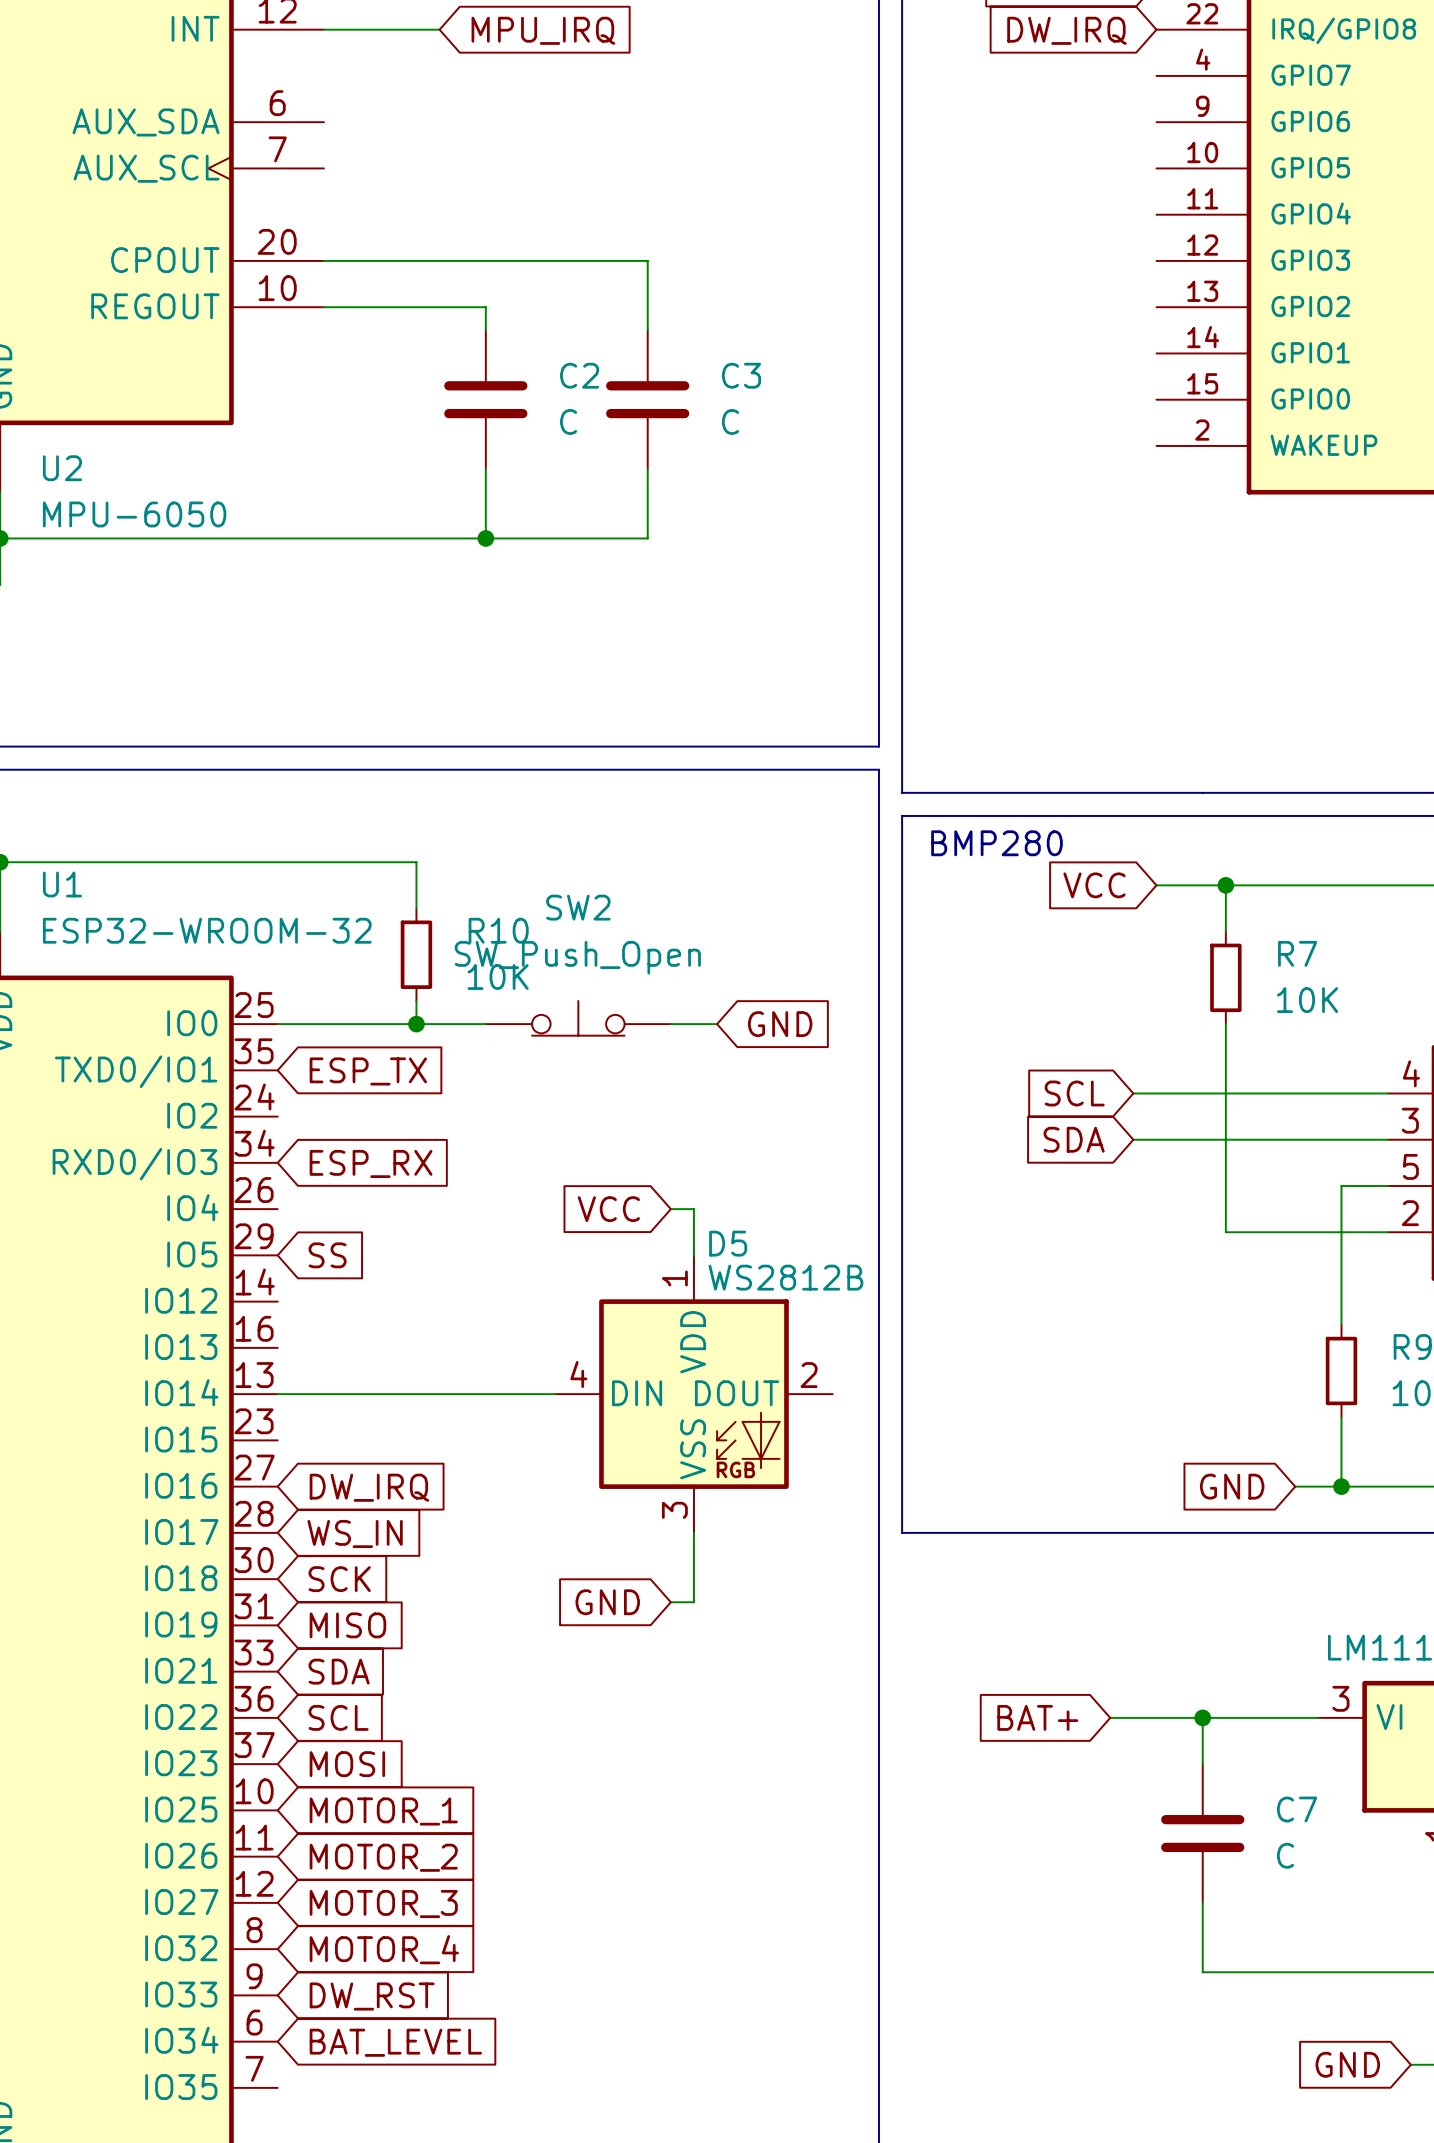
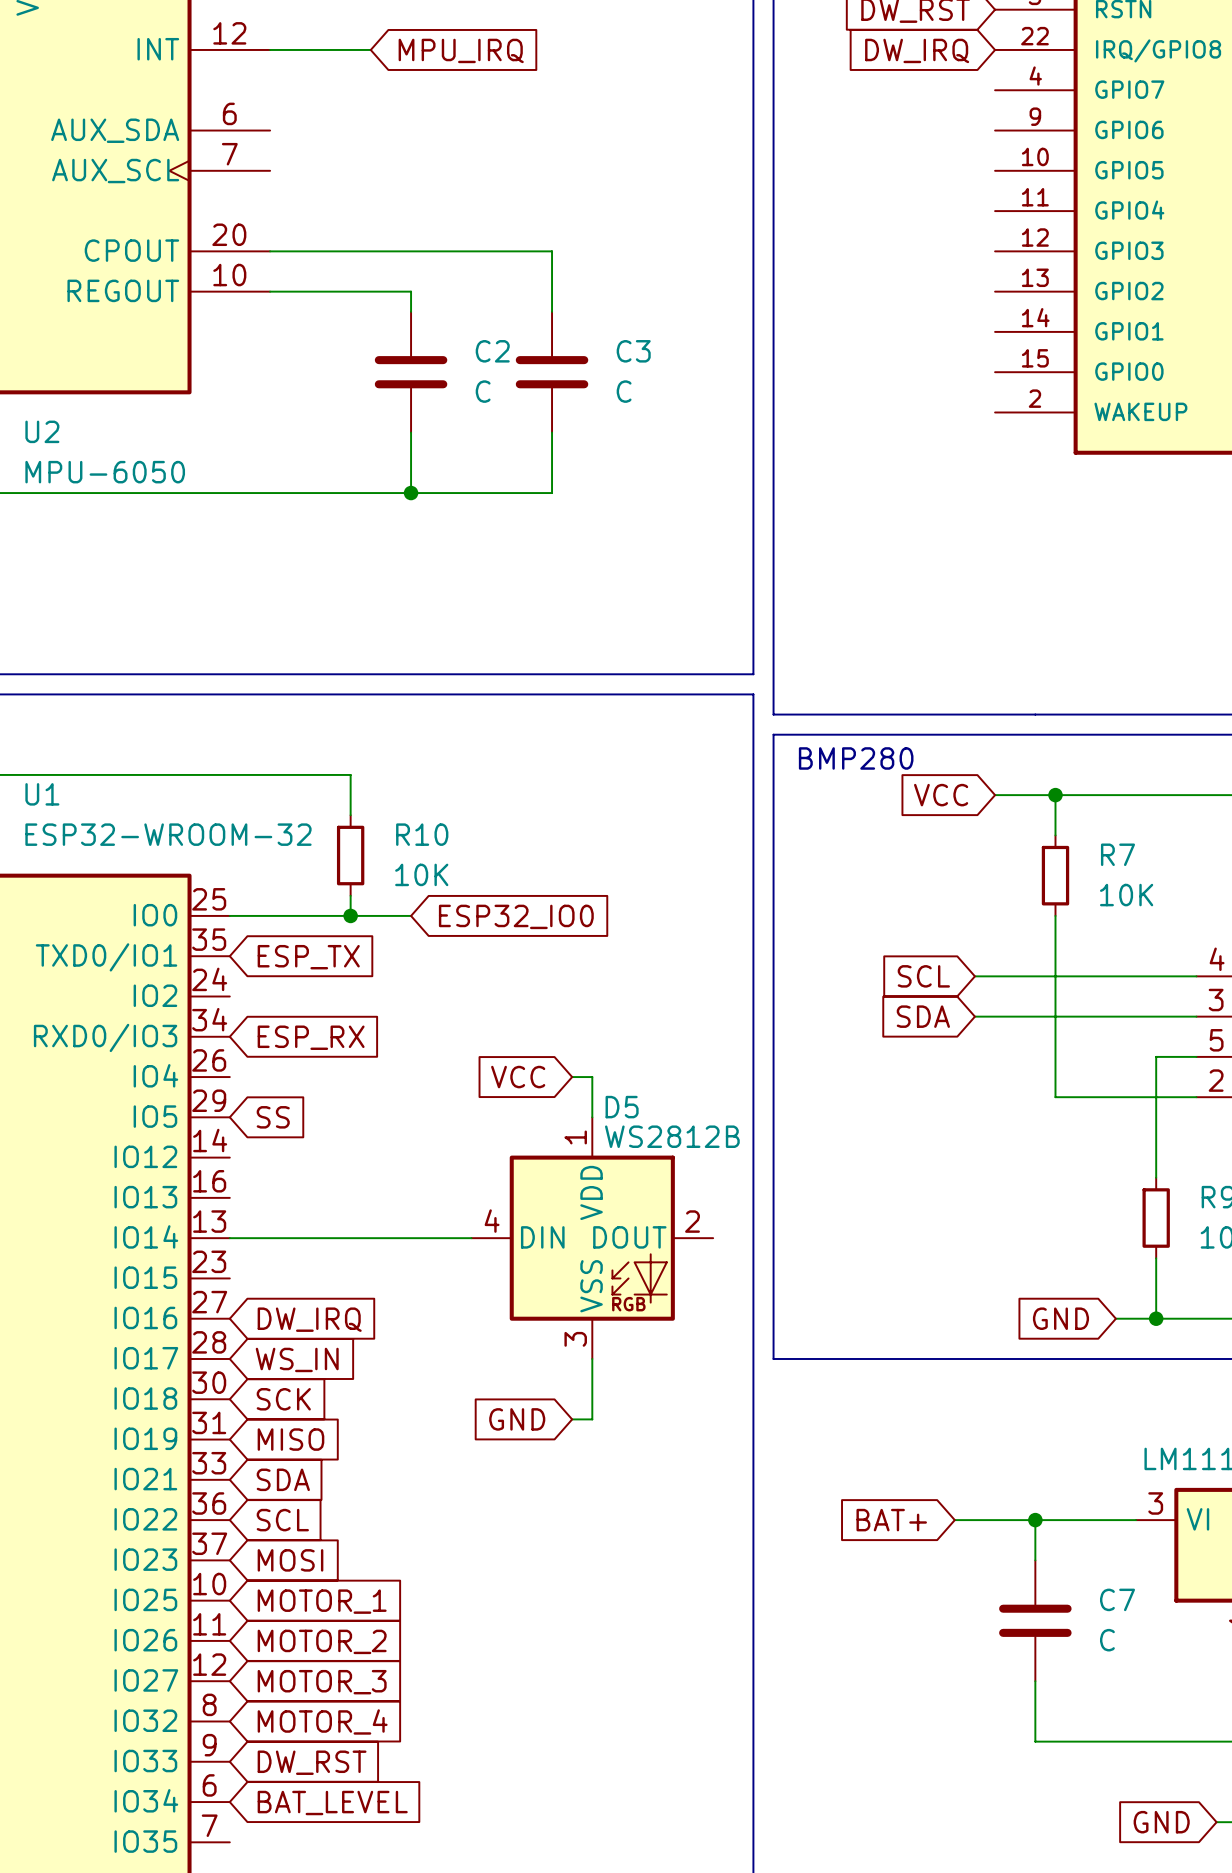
SW2: SW_Push_Open (578, 1018) -> none
wire: (670, 1024) (717, 1024) -> none
global label: GND (780, 1024) -> none
global label: none -> ESP32_IO0 (516, 916)

